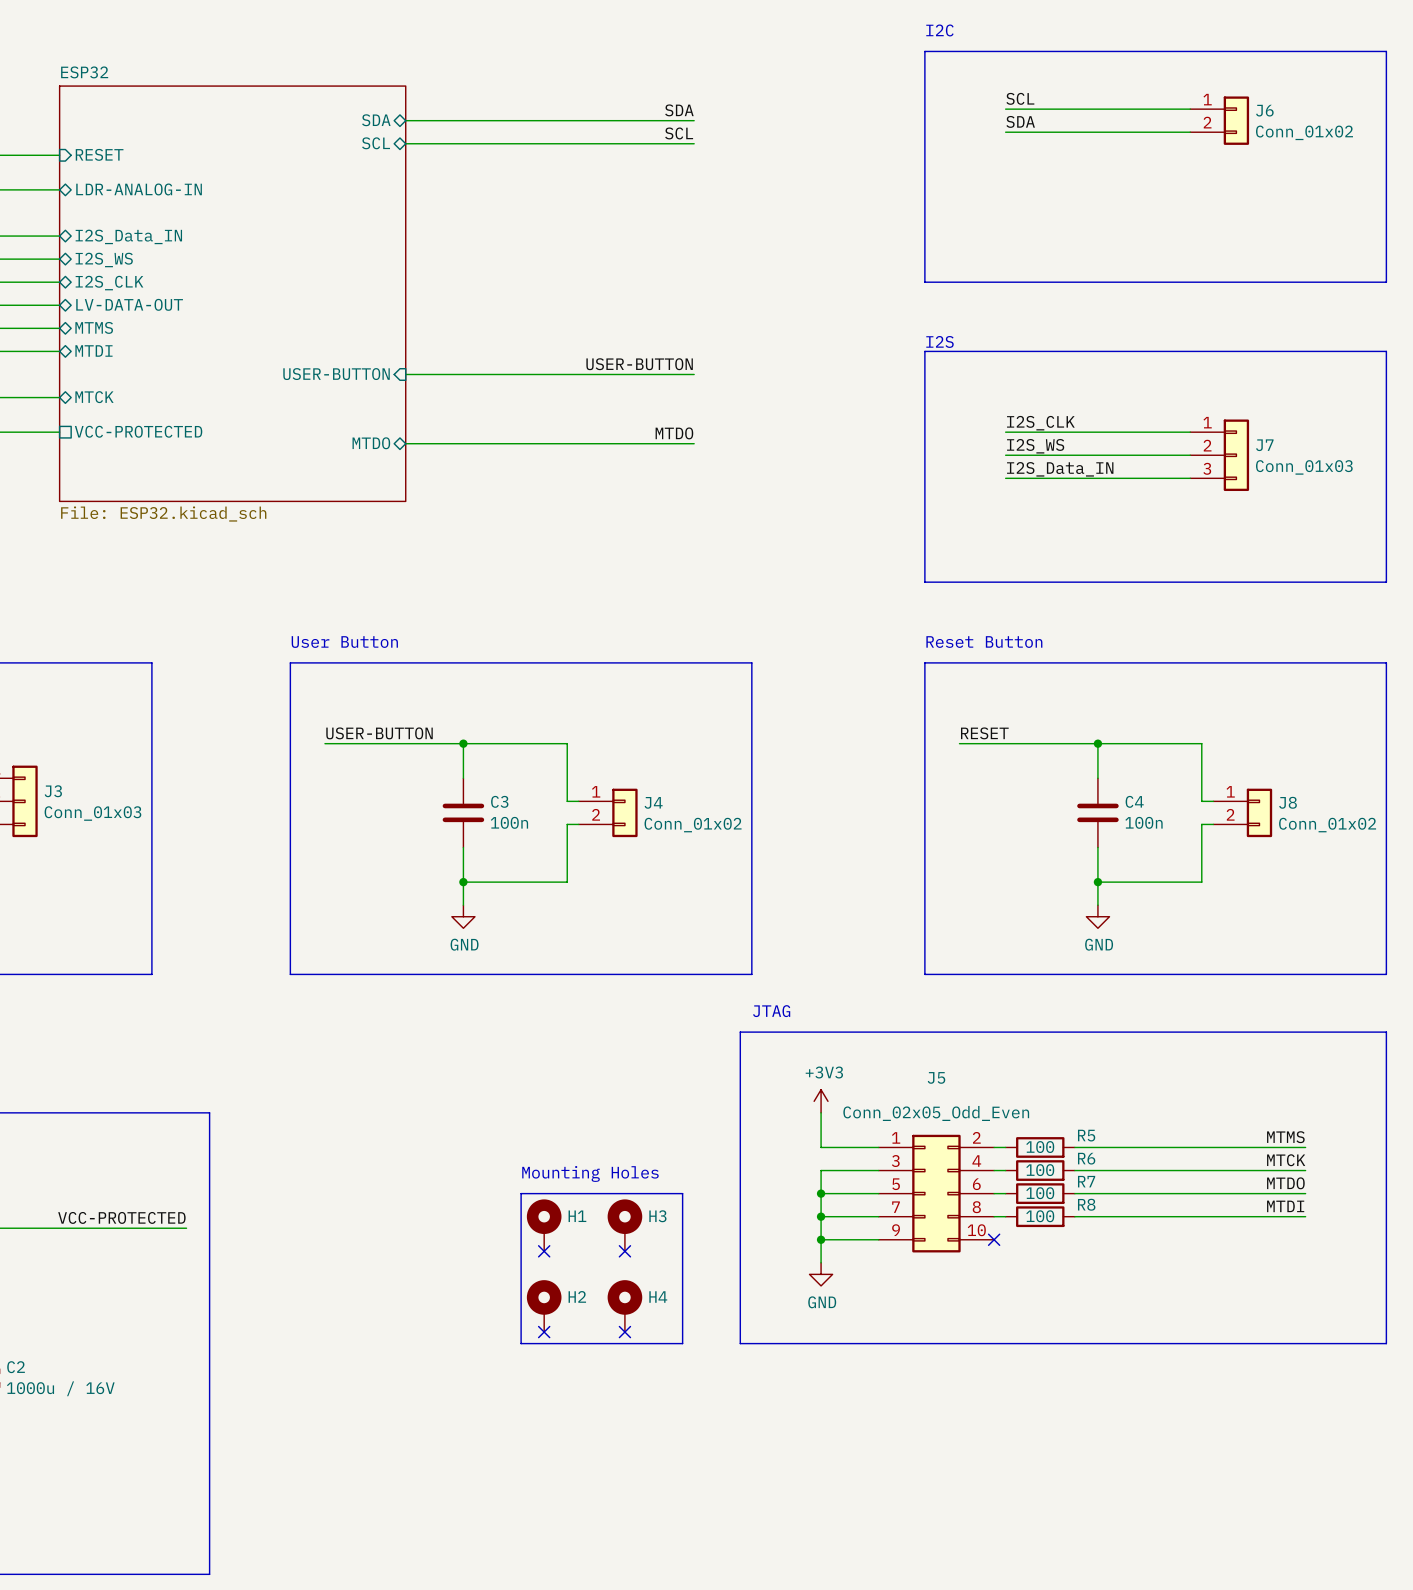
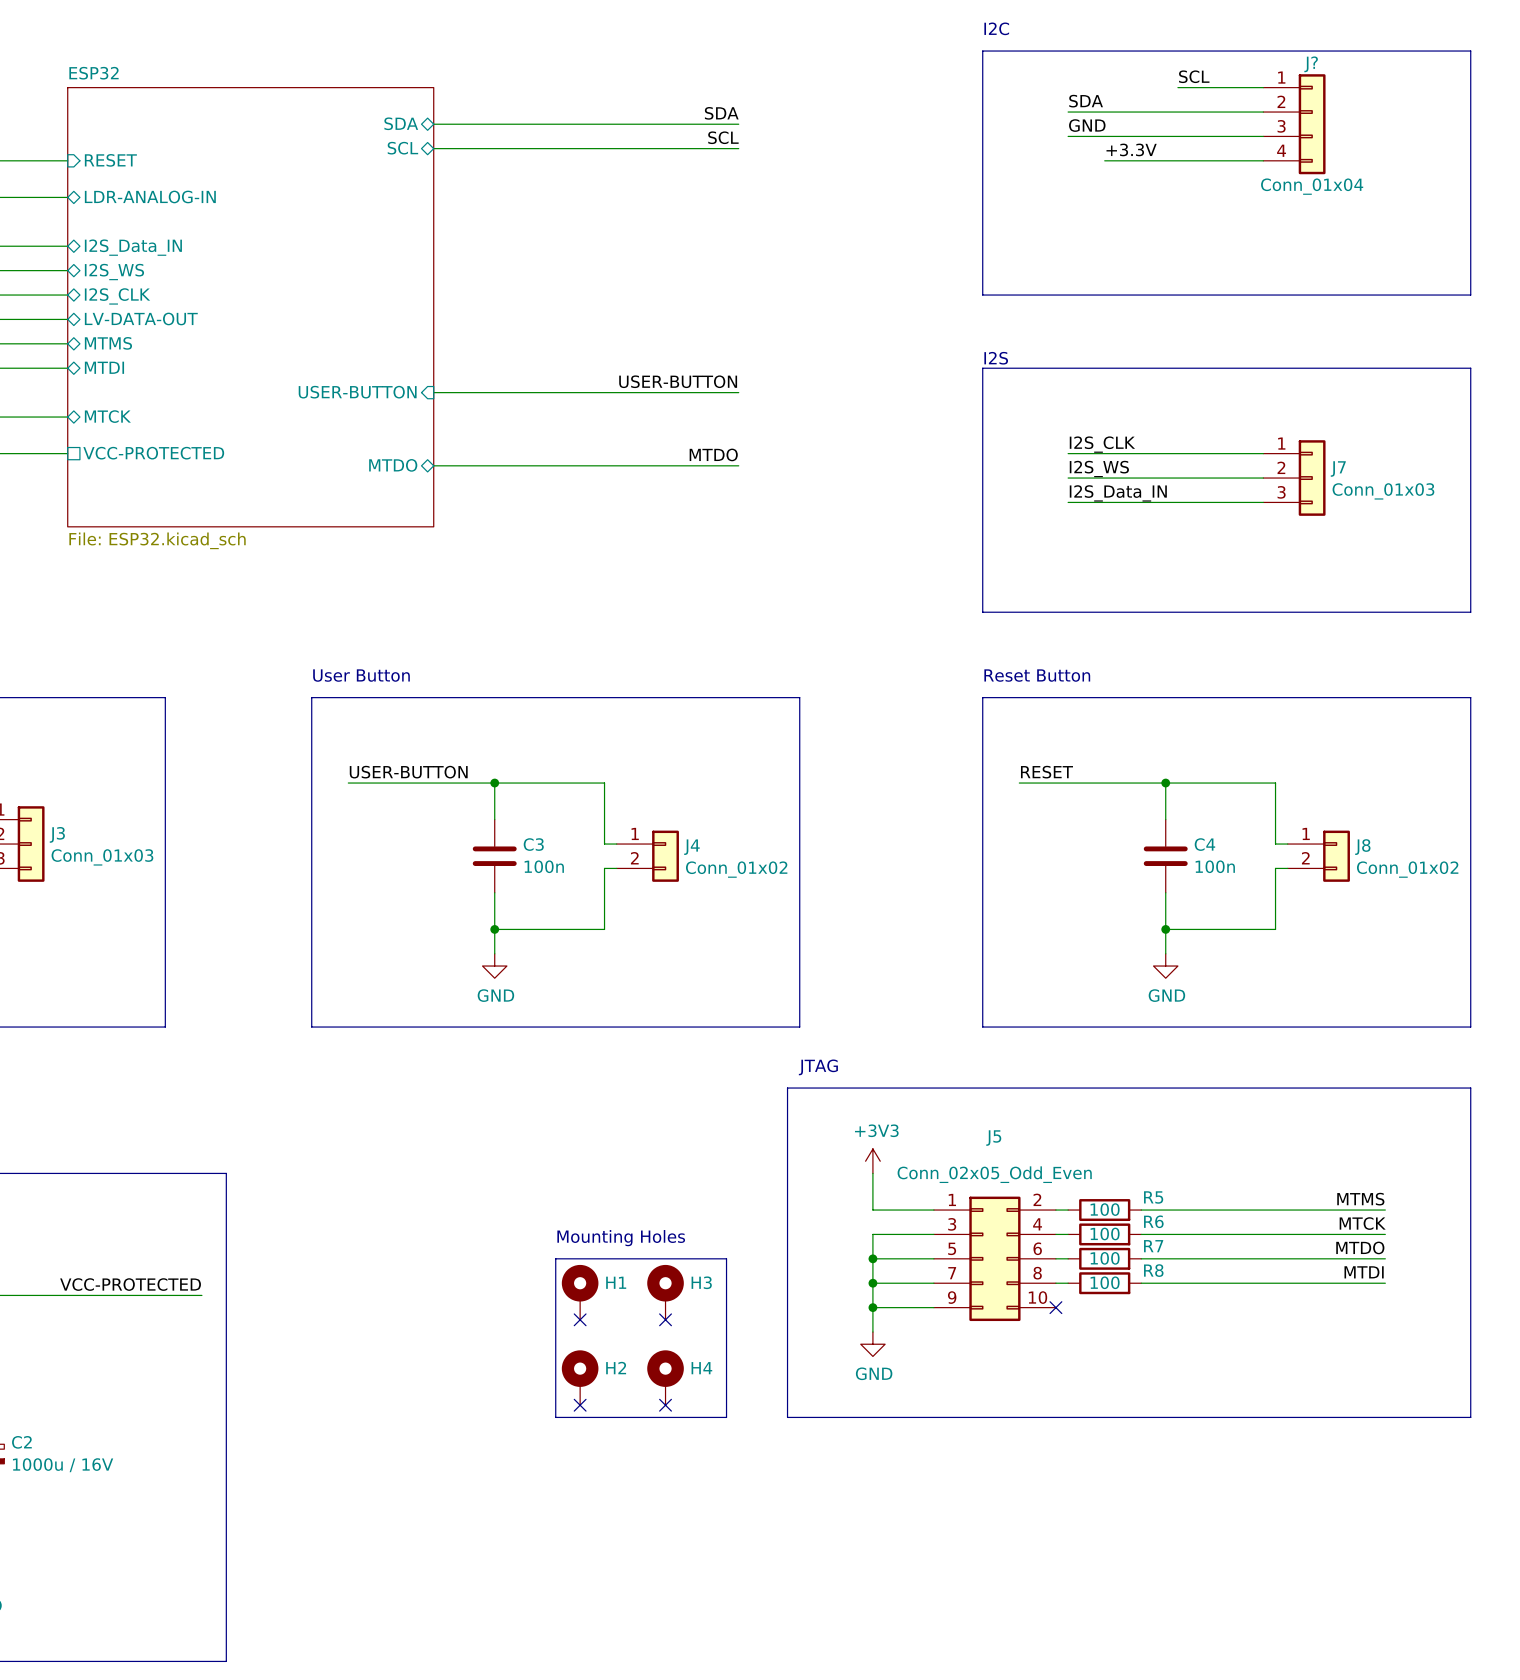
label: none -> SCL (1194, 76)
wire: none -> (1177, 87) (1263, 87)
label: SCL (1020, 98) -> SDA (1086, 101)
J6: Conn_01x02 (1219, 120) -> none
J?: none -> Conn_01x04 (1294, 124)
label: SDA (1020, 121) -> GND (1087, 125)
label: none -> +3.3V (1131, 149)
wire: none -> (1104, 160) (1263, 160)

